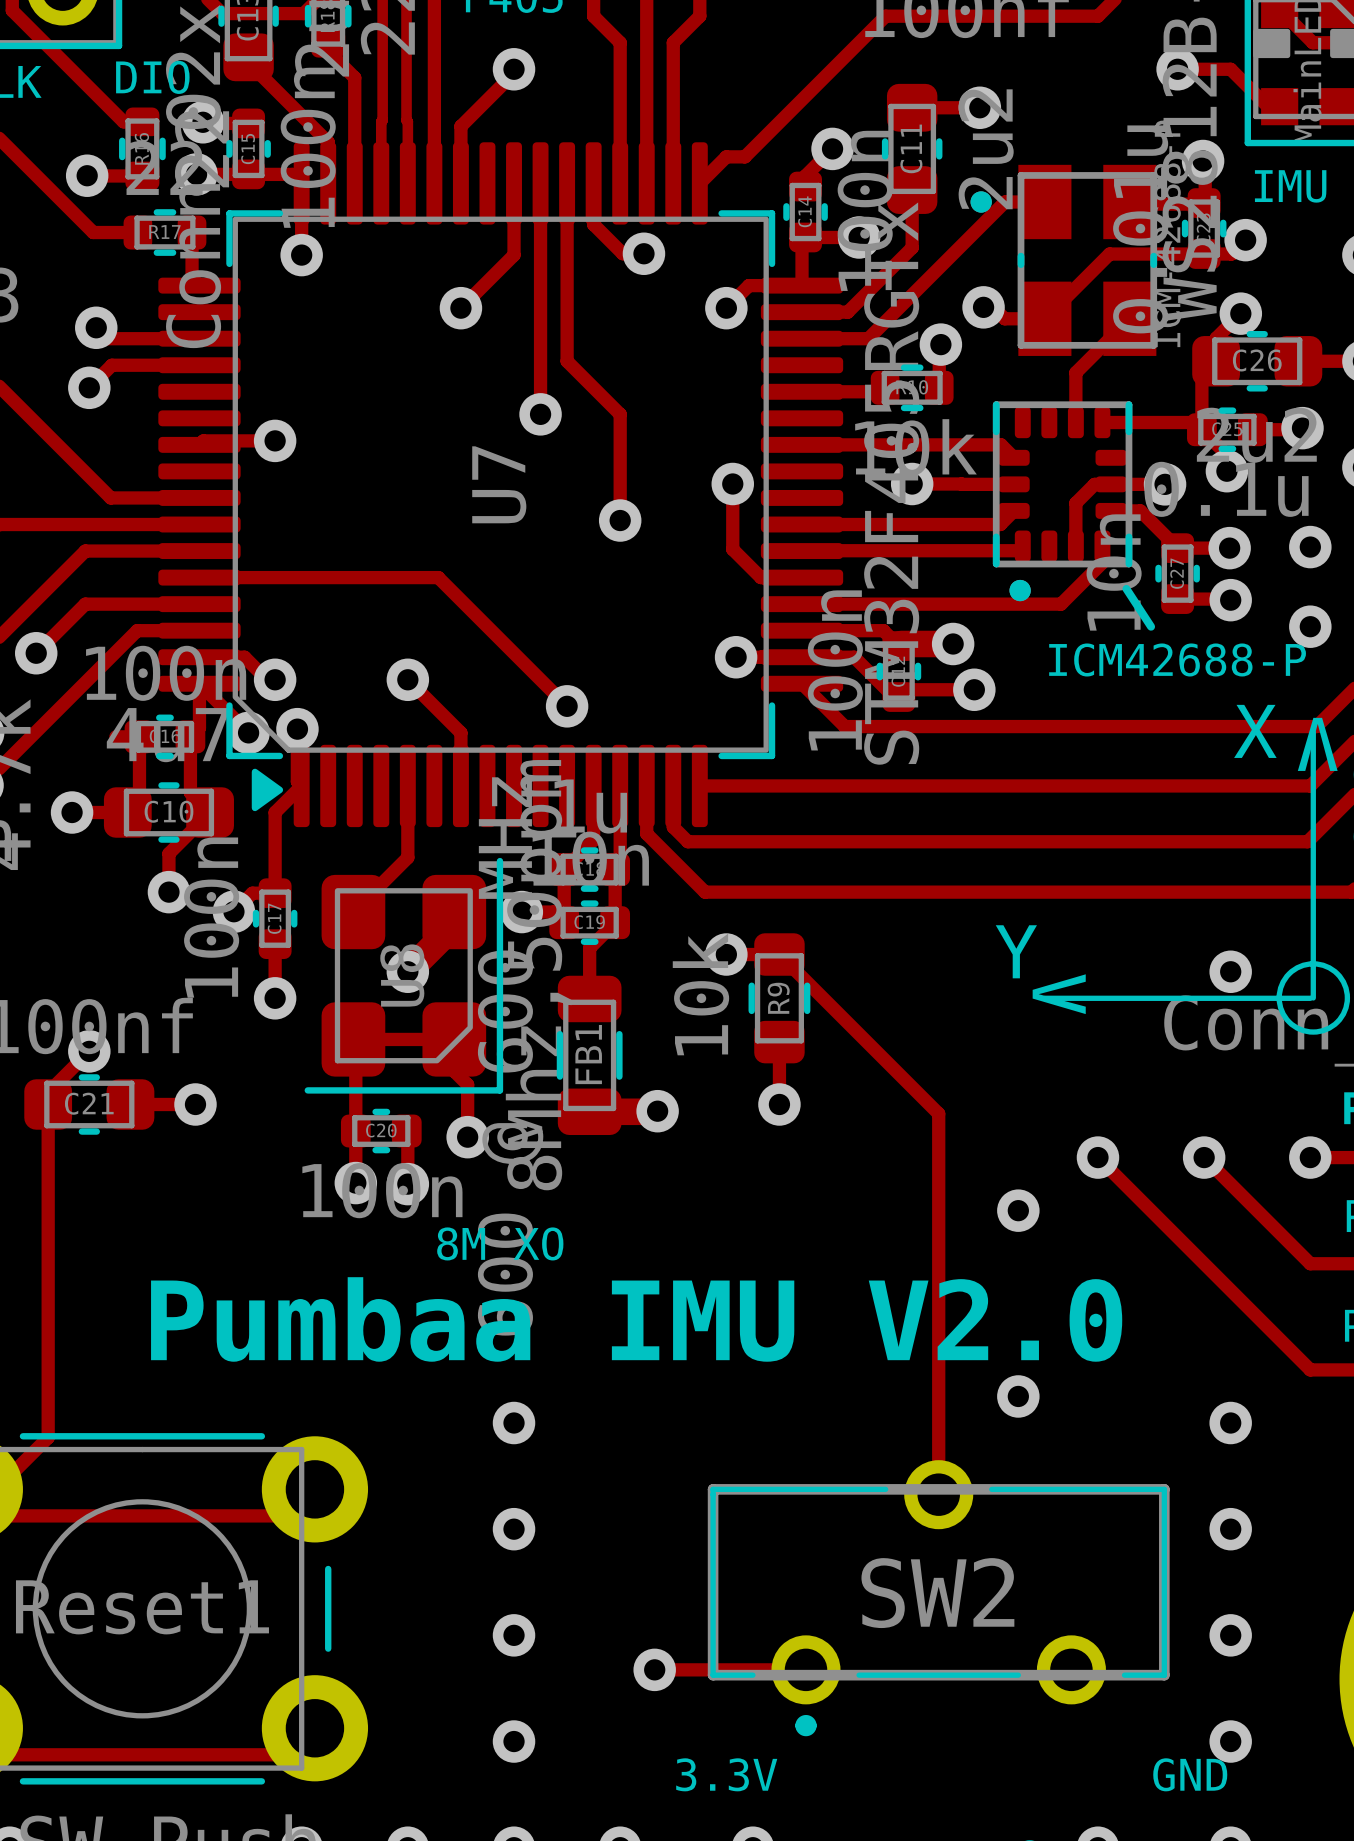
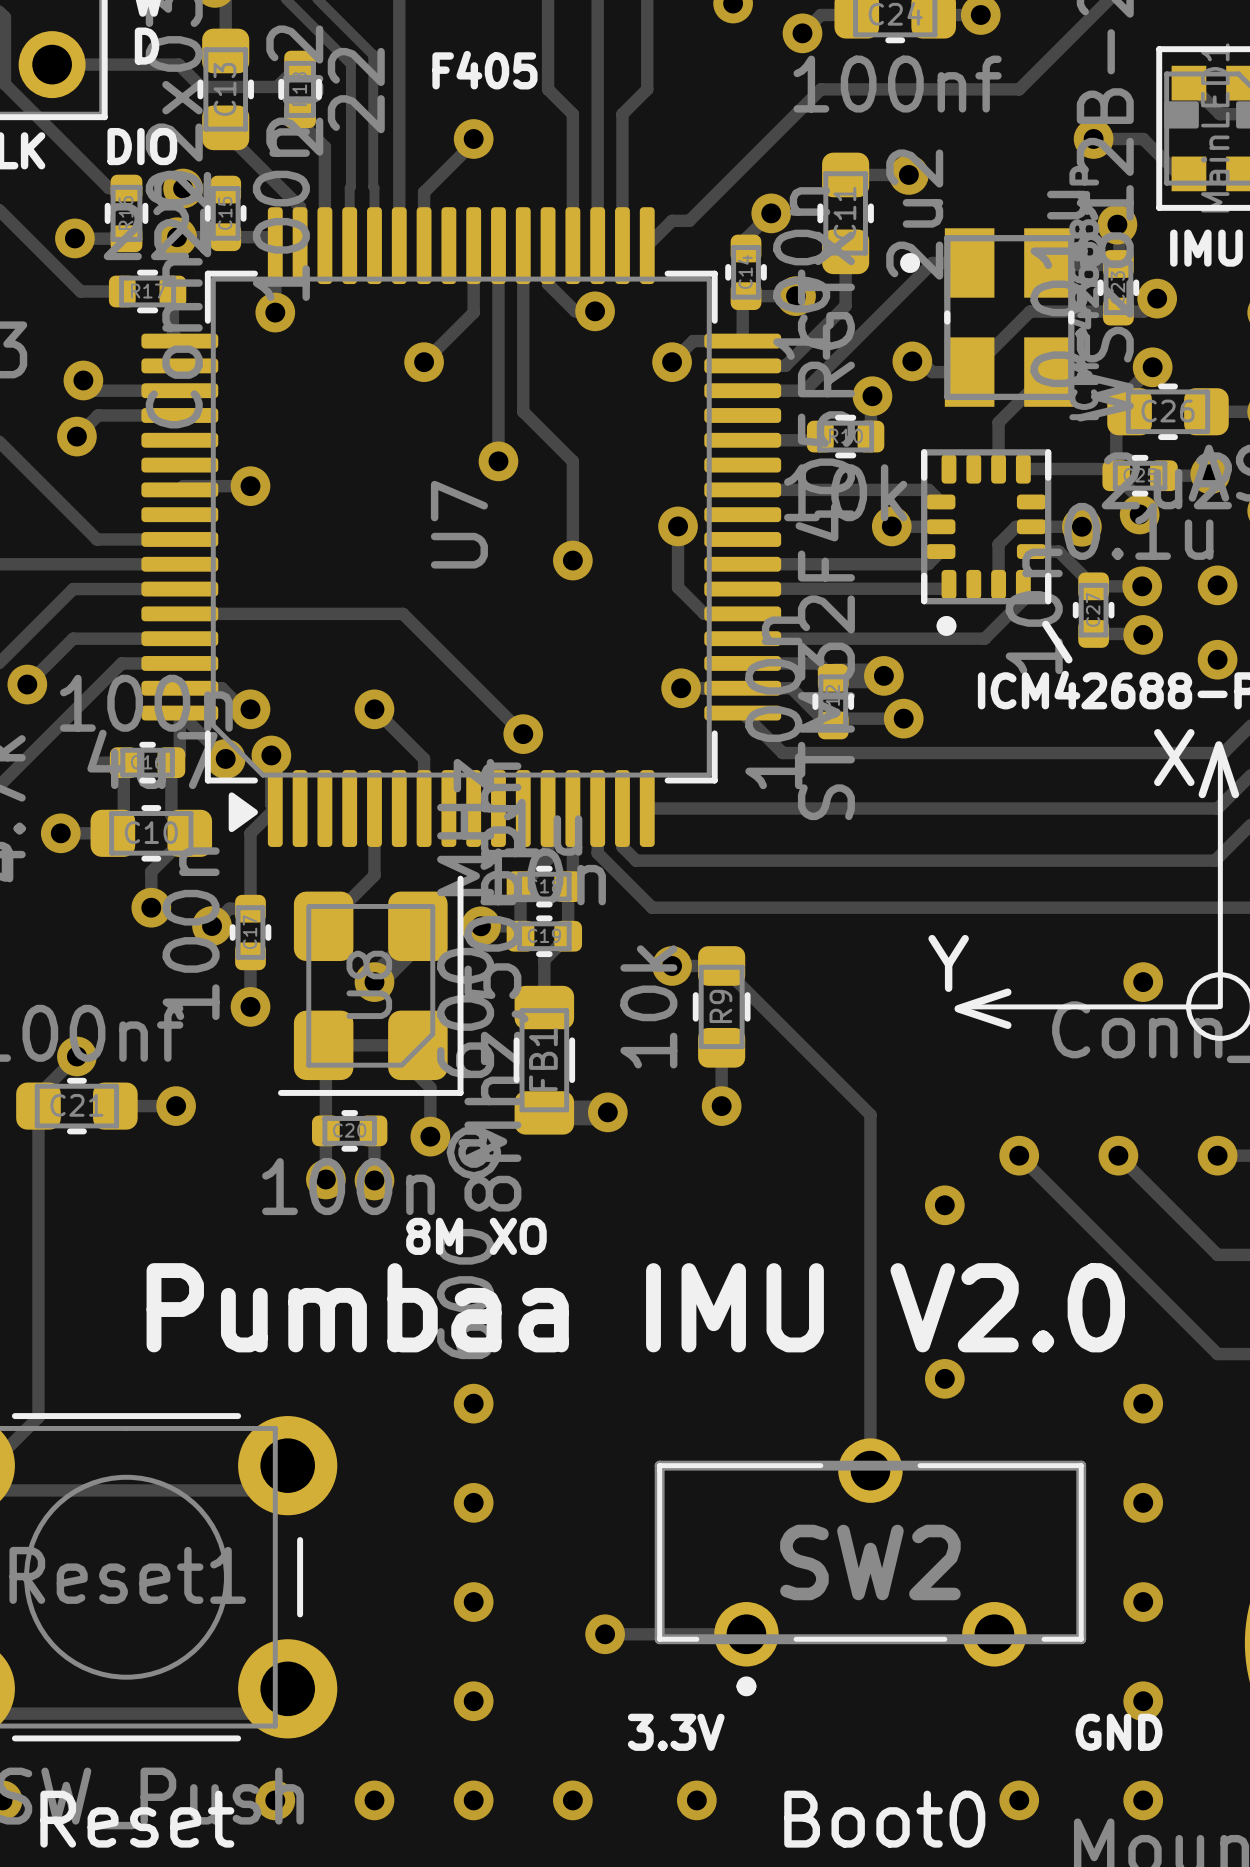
track: (912, 484) (961, 484) -> none
via position: (912, 484) -> (891, 526)

